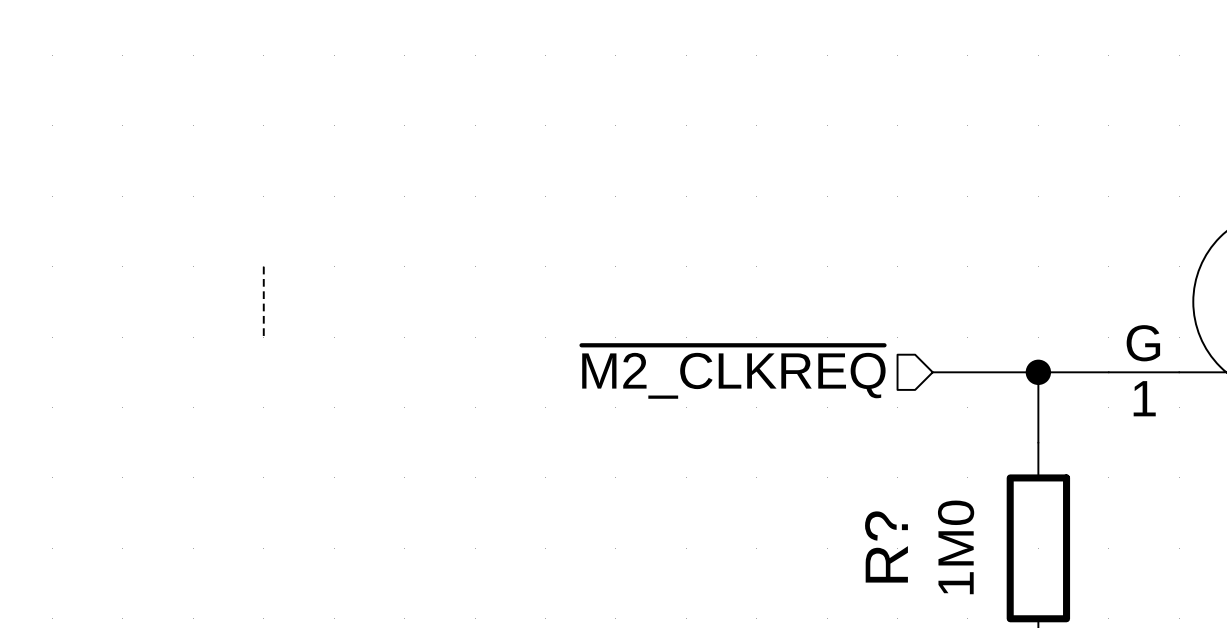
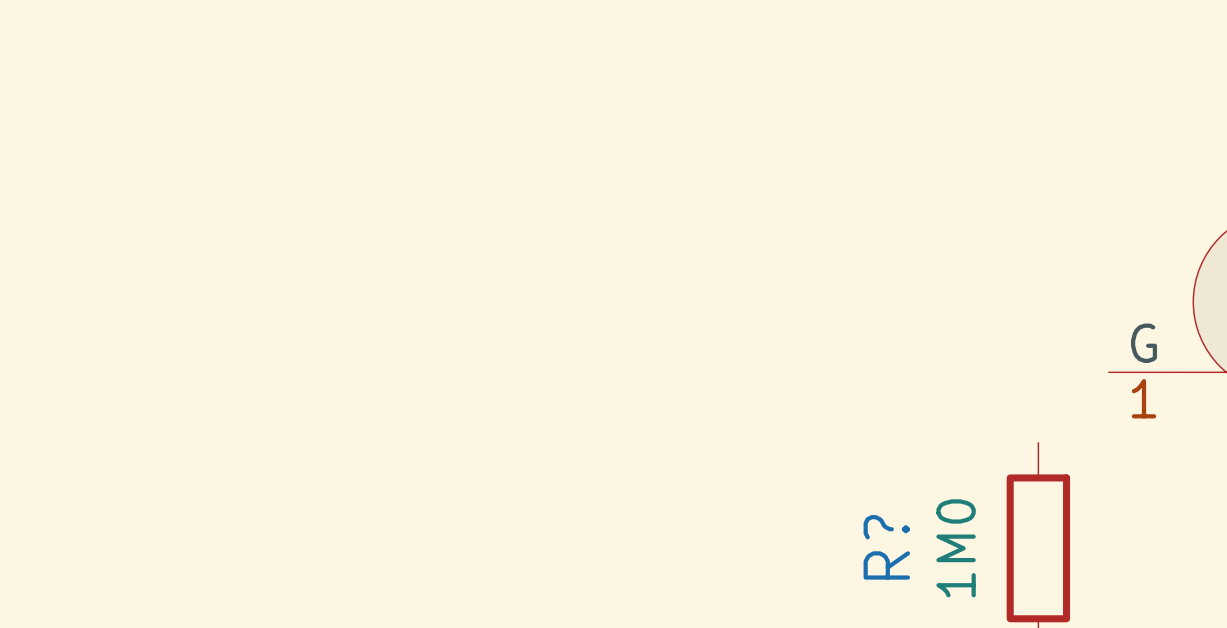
line: (263, 266) (263, 337) -> none
hierarchical label: ~{M2_CLKREQ} (733, 372) -> none
wire: (932, 372) (1108, 372) -> none
wire: (1038, 372) (1038, 442) -> none
junction: (1038, 372) -> none

